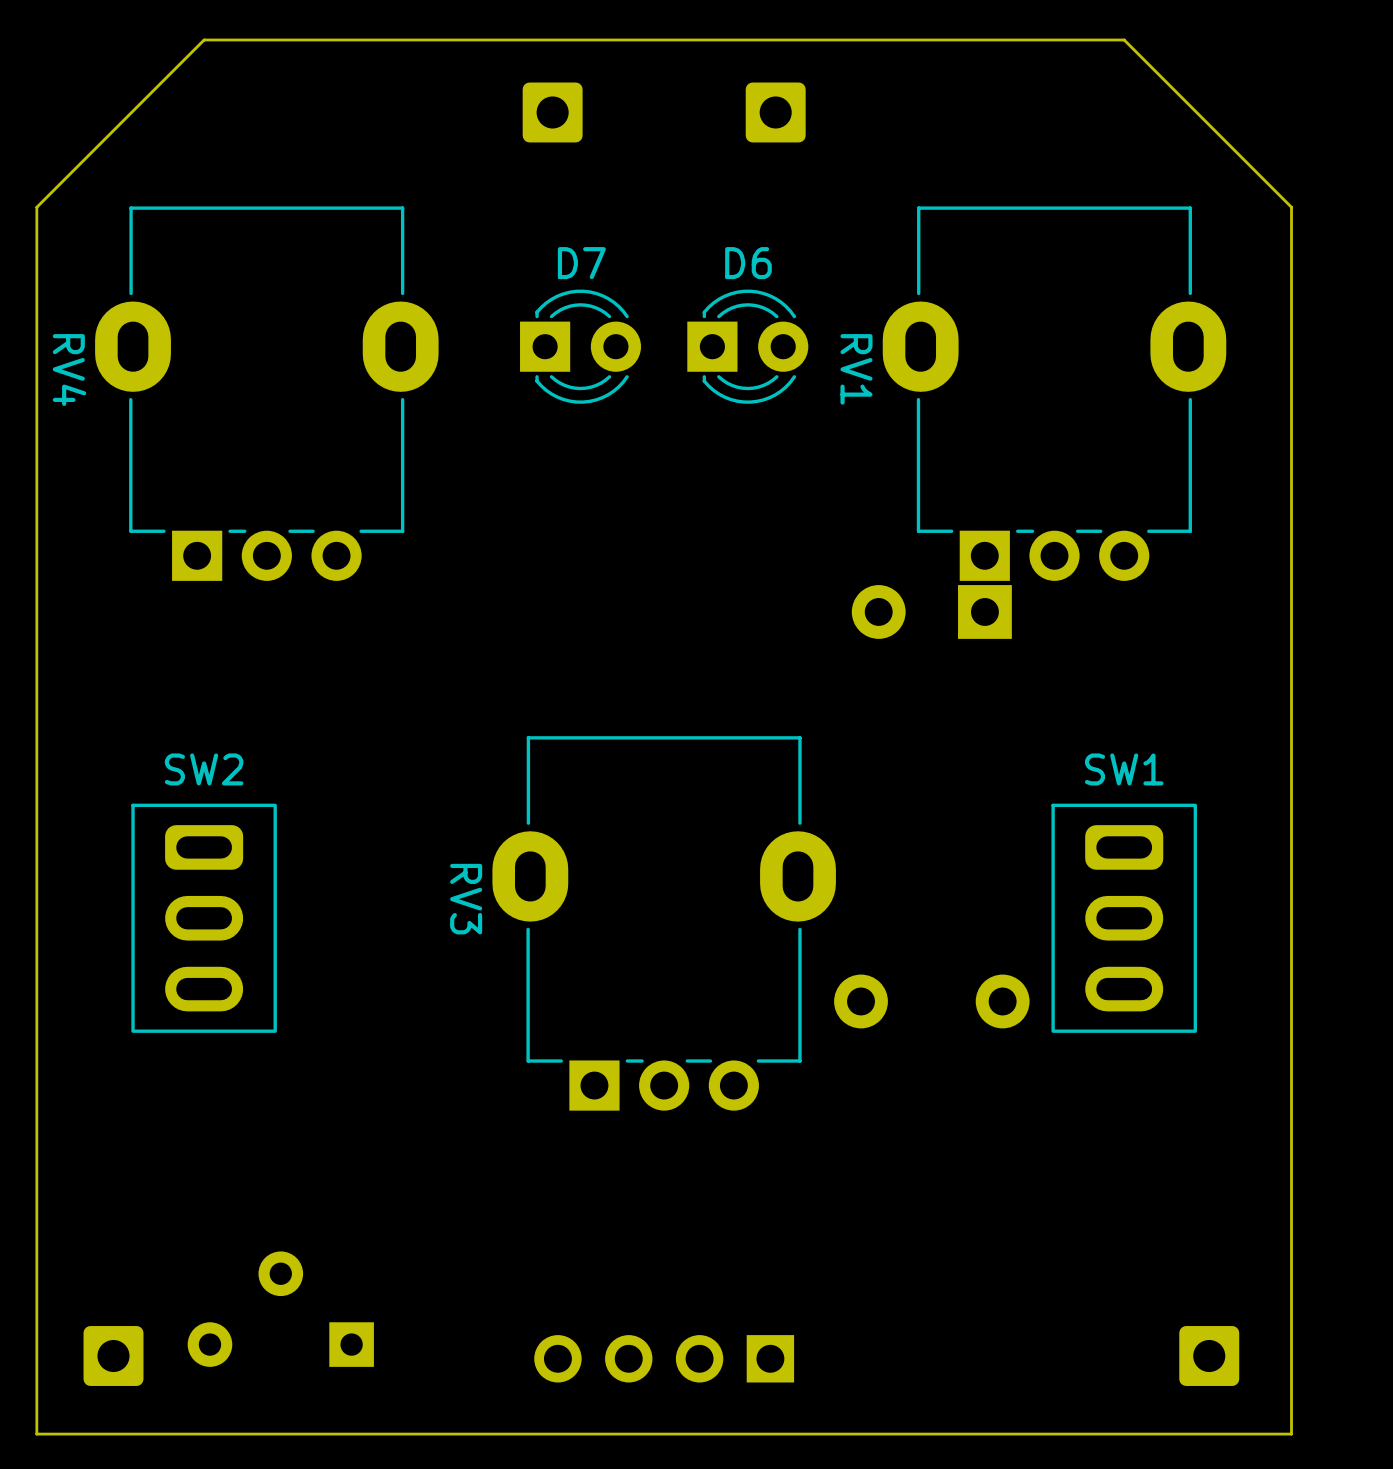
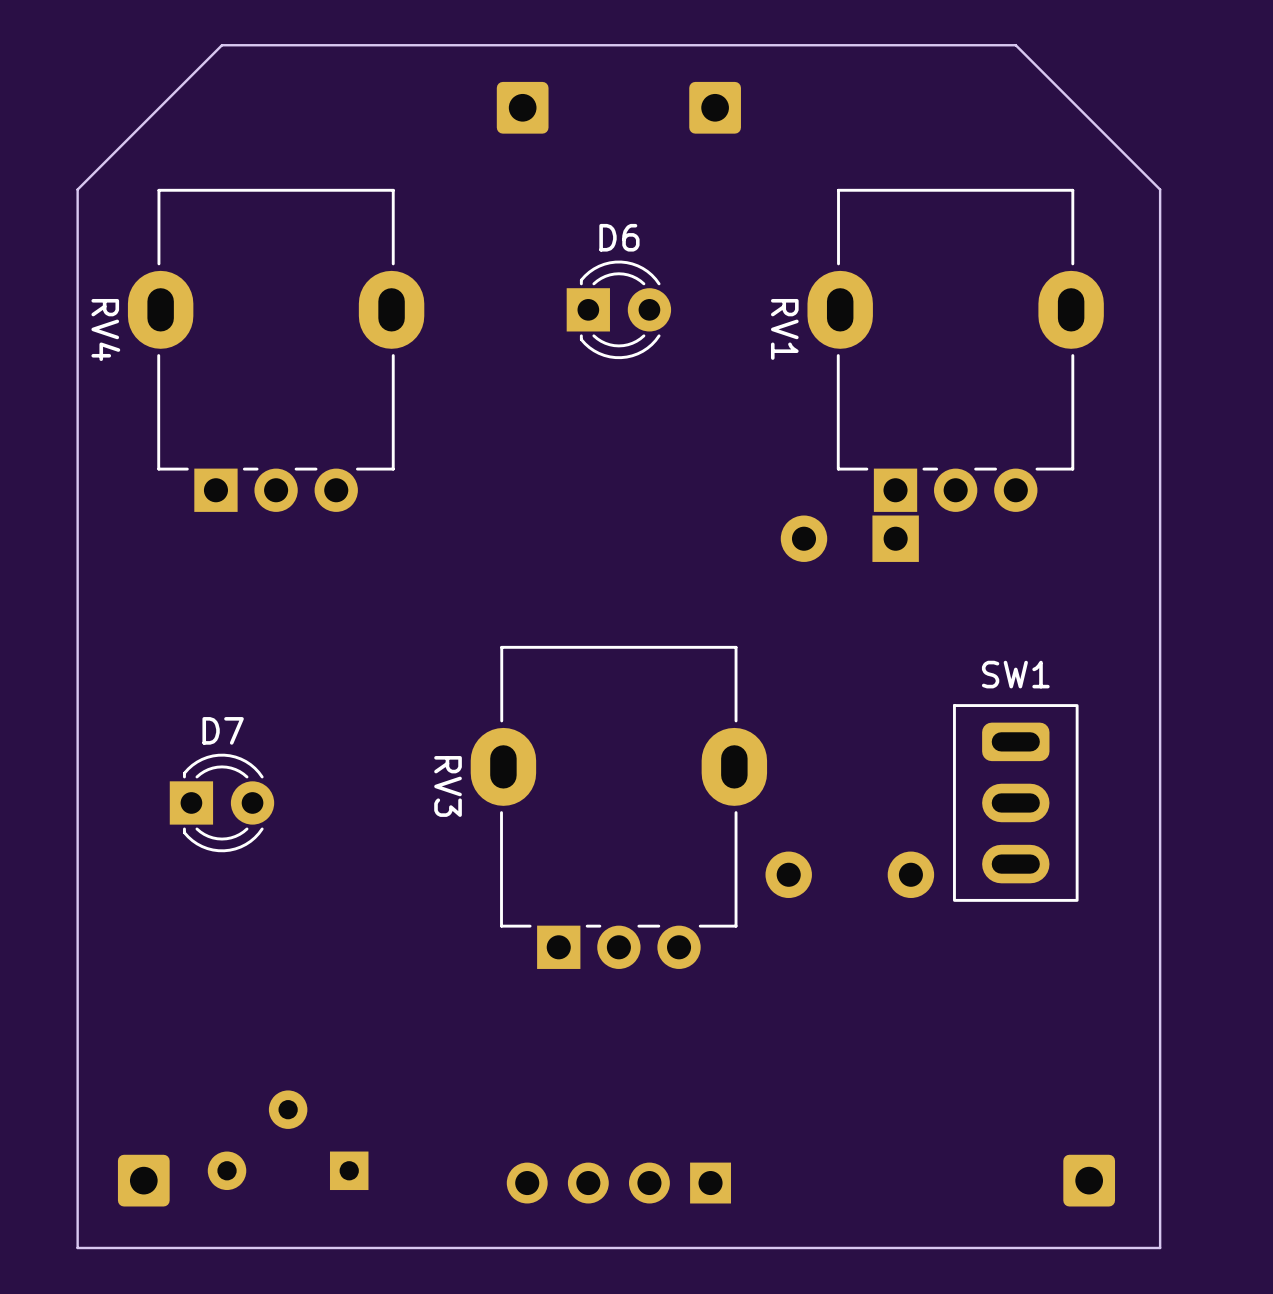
D7 position: (580, 346) -> (221, 802)
D6 position: (747, 346) -> (618, 309)
SW2: (204, 918) -> none

